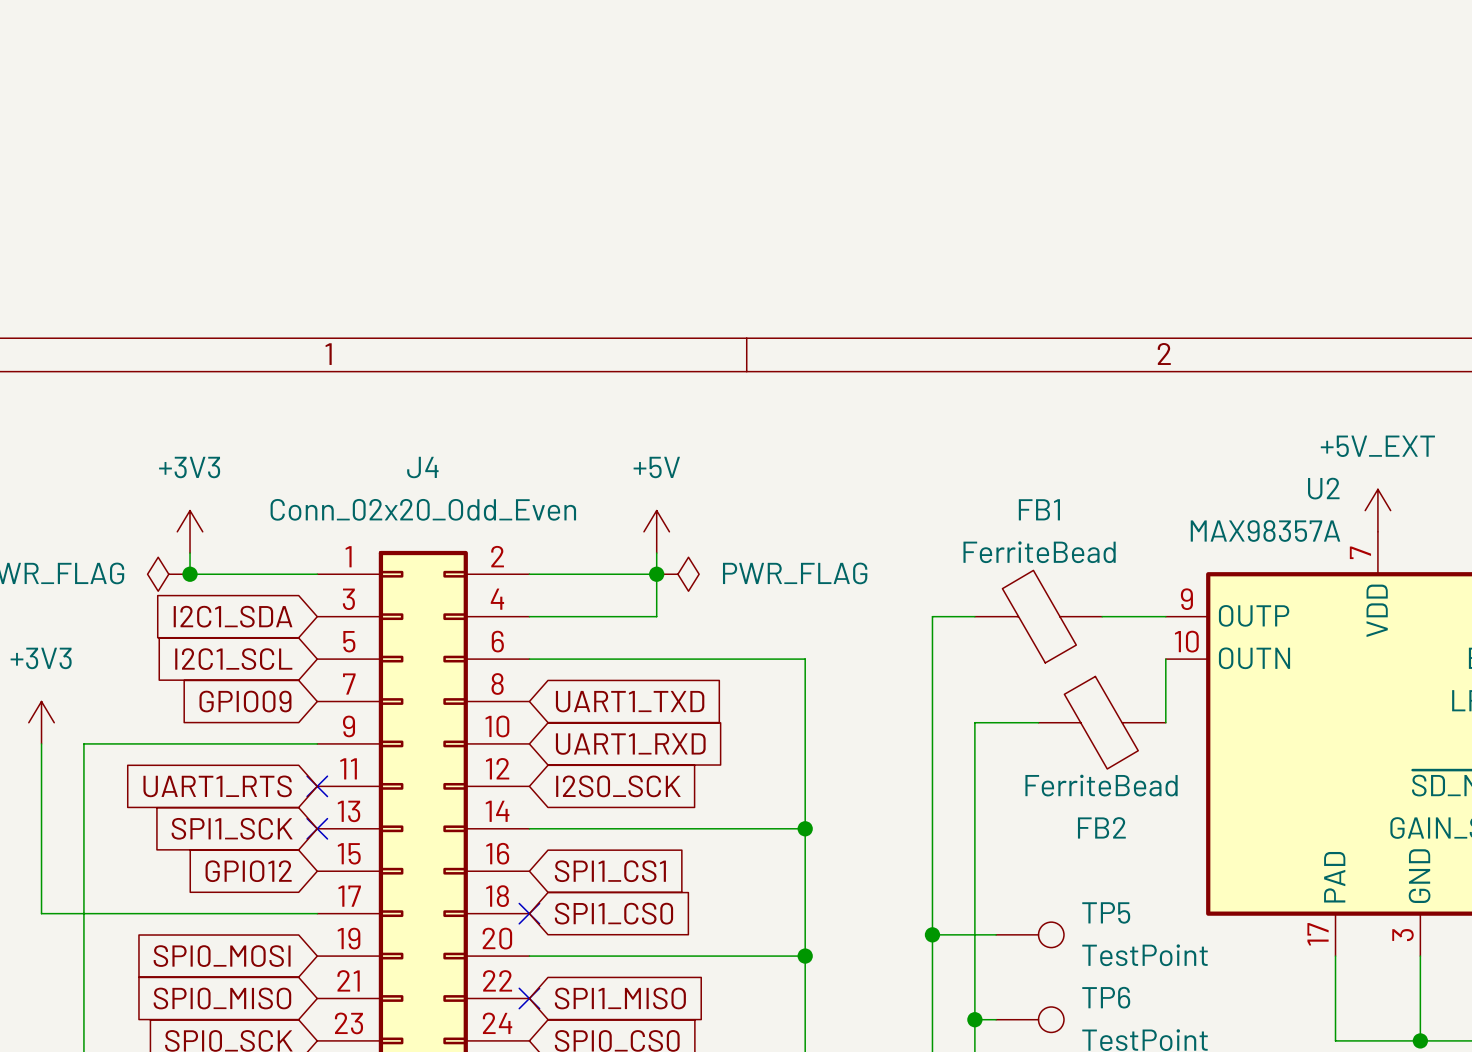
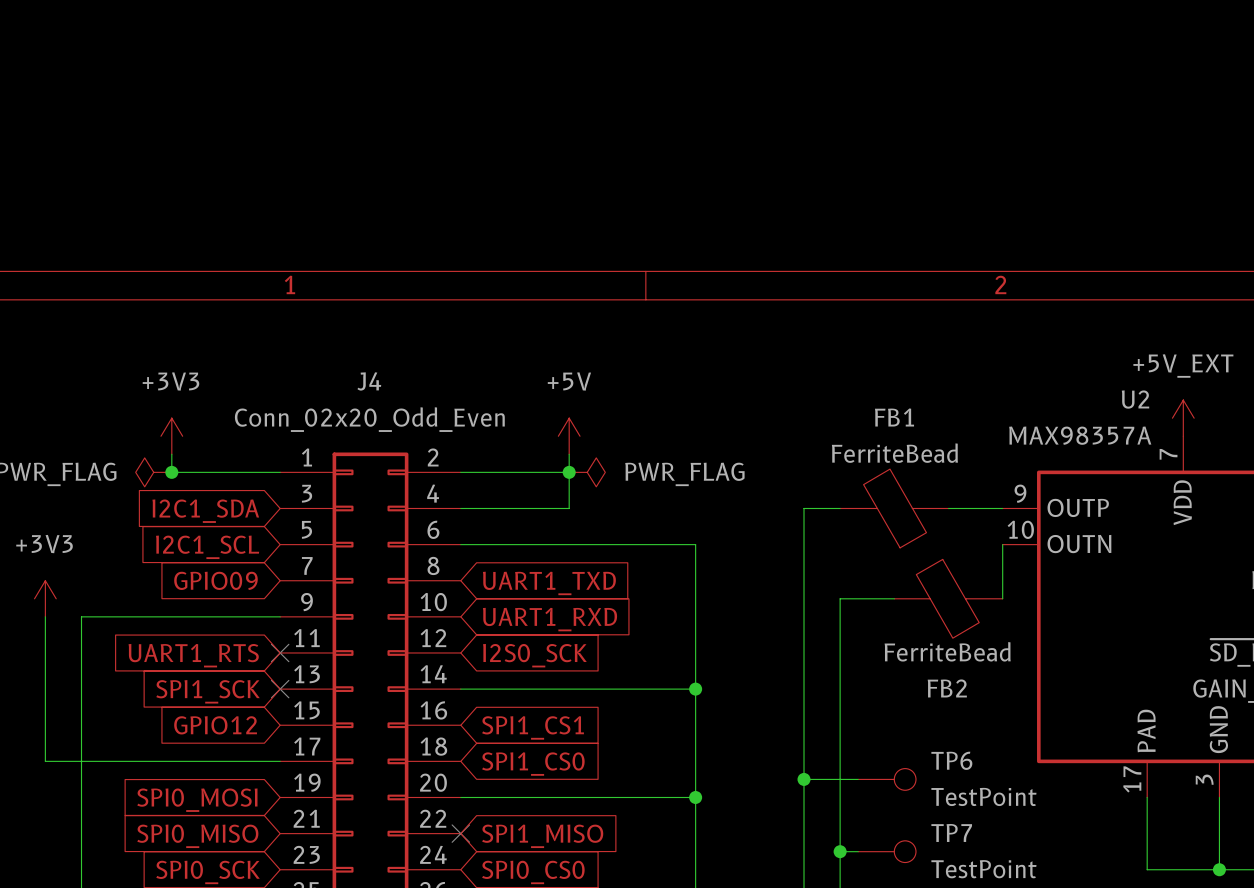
TP5 name: TP5 (1106, 912) -> TP6 (951, 760)
no-connect mark: (529, 913) -> none
TP6 name: TP6 (1106, 997) -> TP7 (951, 832)

